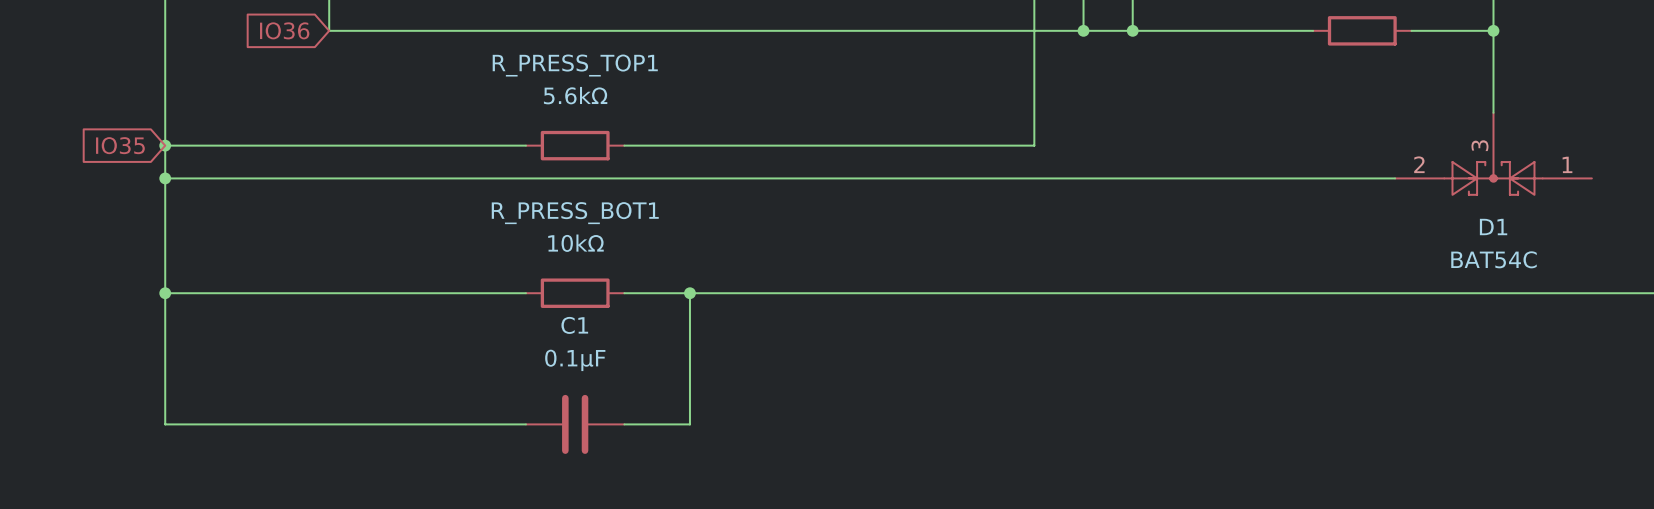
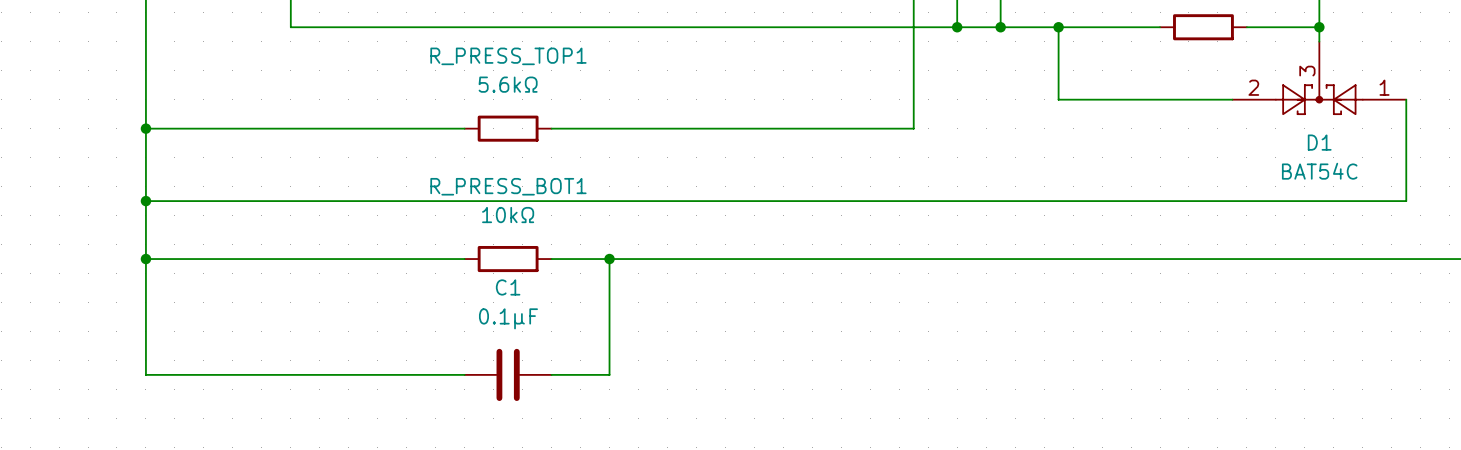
global label: IO36 (284, 30) -> none
wire: none -> (1058, 27) (1058, 99) (1232, 99)
junction: none -> (1058, 27)
wire: none -> (1406, 99) (1406, 201) (145, 201)
global label: IO35 (120, 145) -> none
D1 position: (1493, 153) -> (1319, 77)
wire: (165, 178) (1395, 178) -> none
junction position: (165, 178) -> (145, 201)

